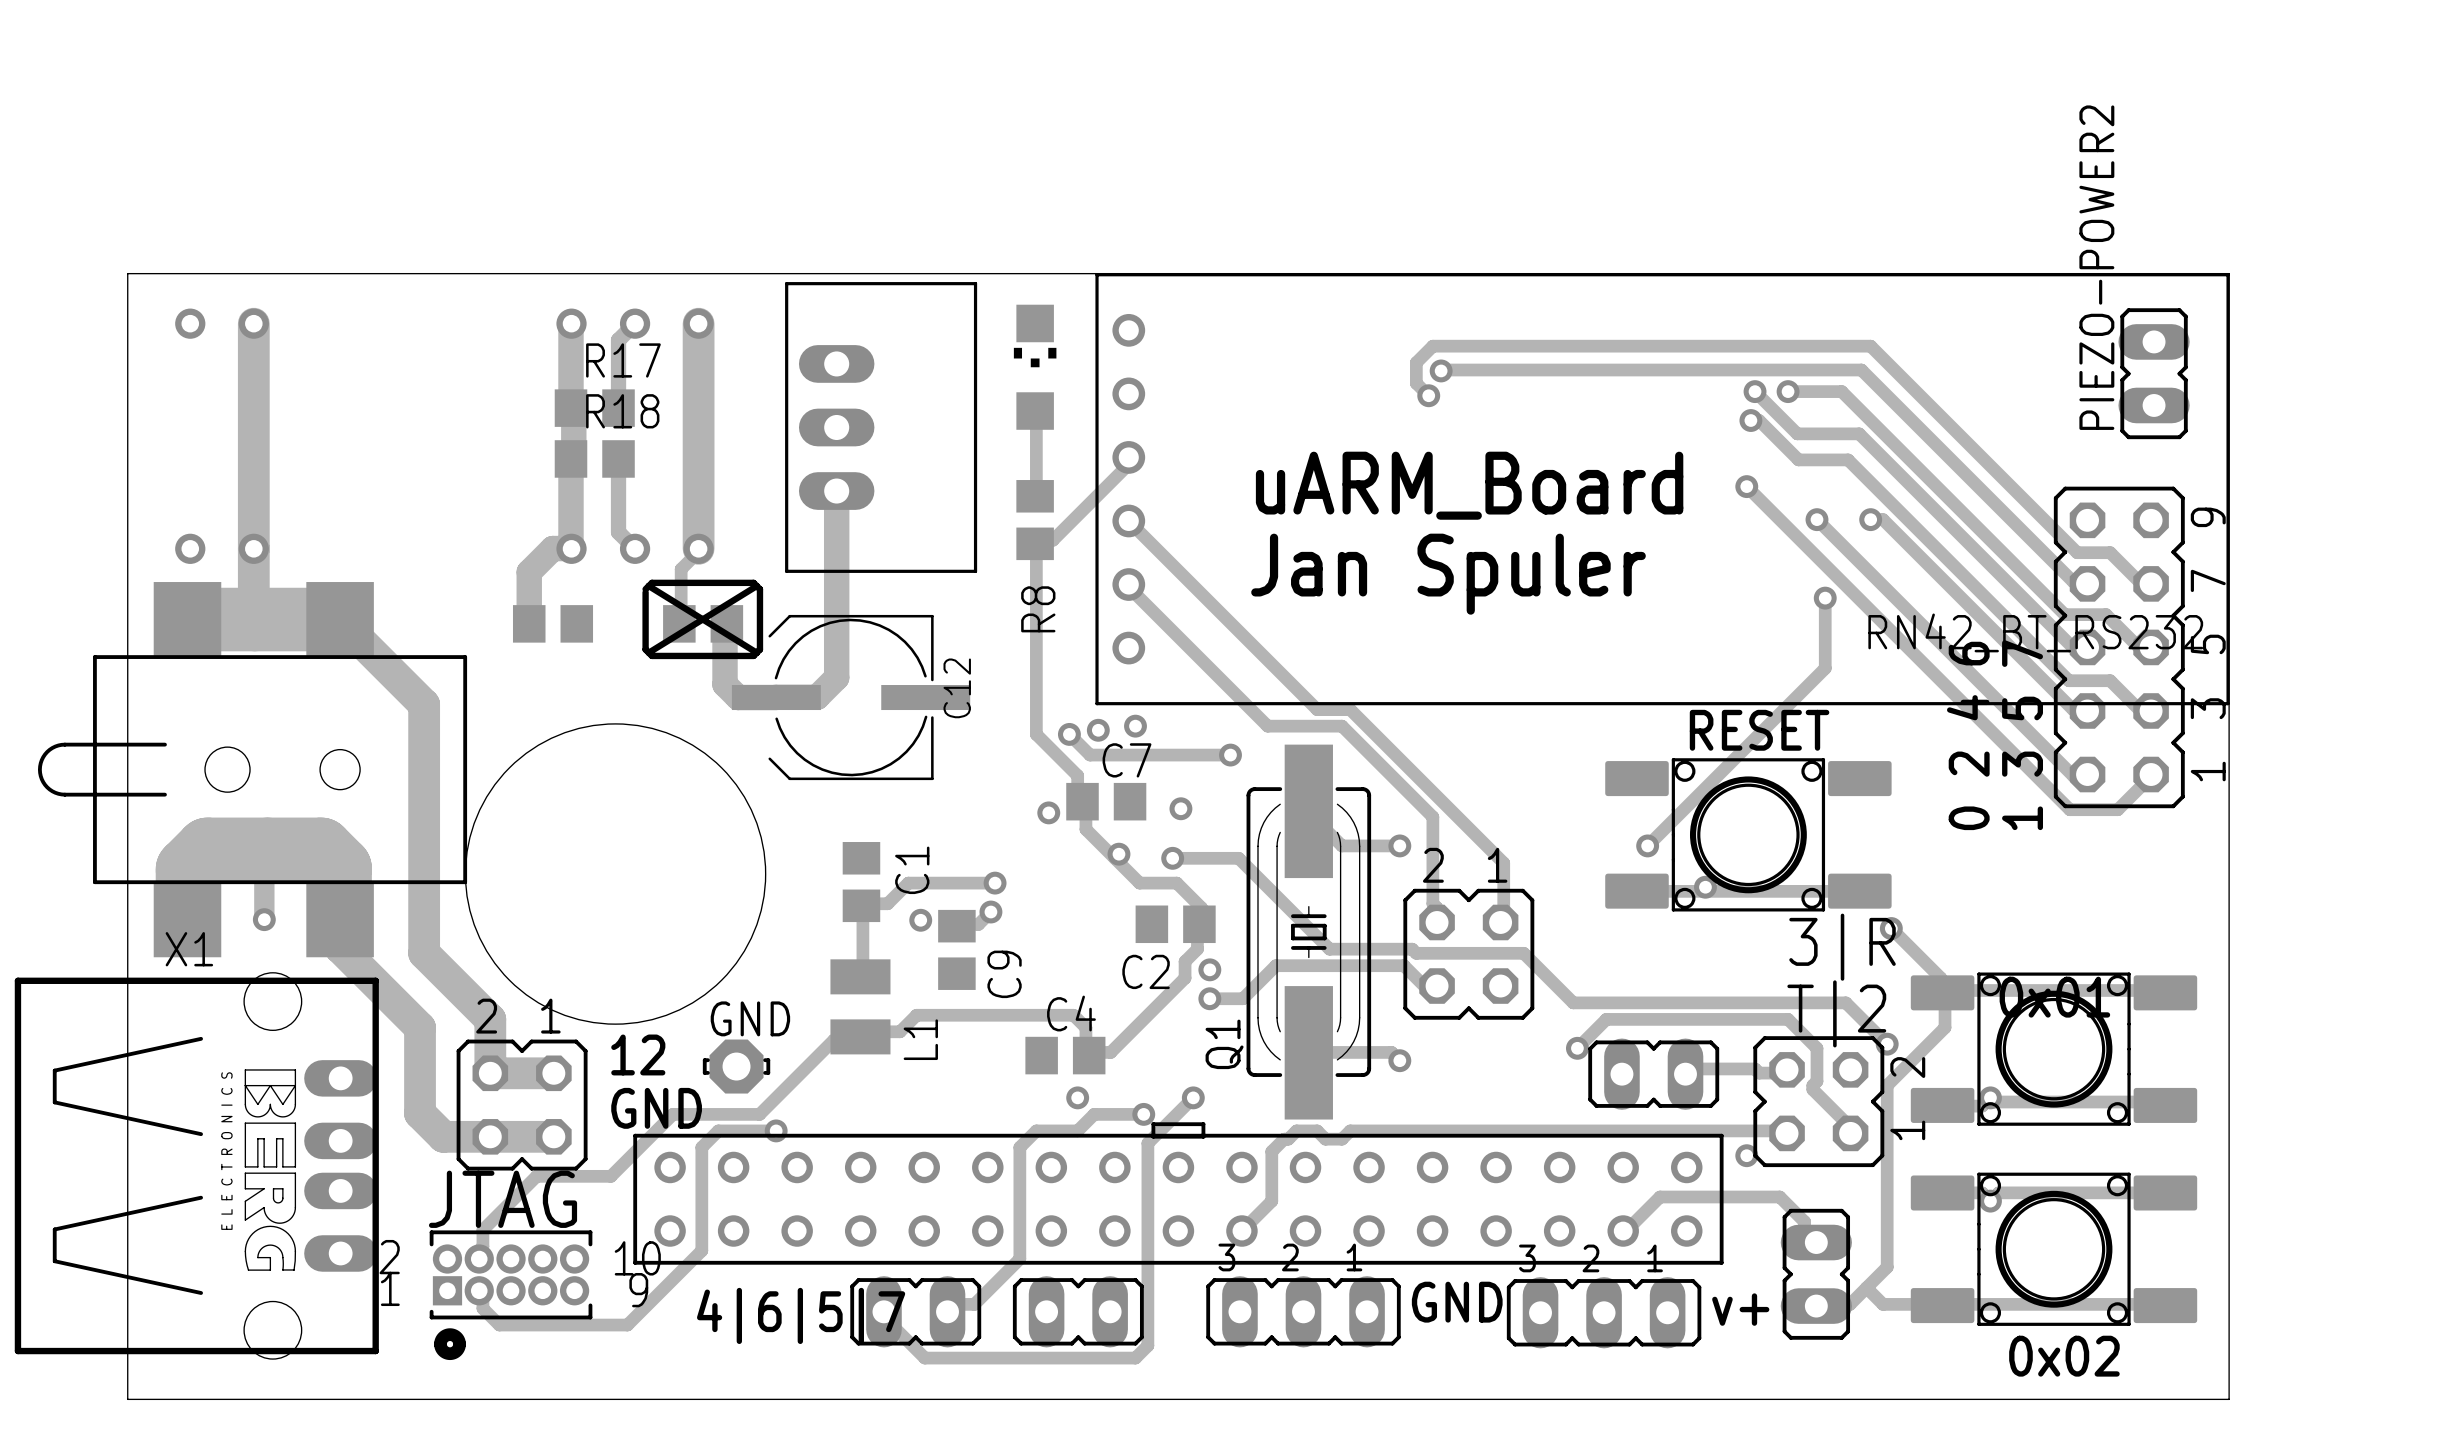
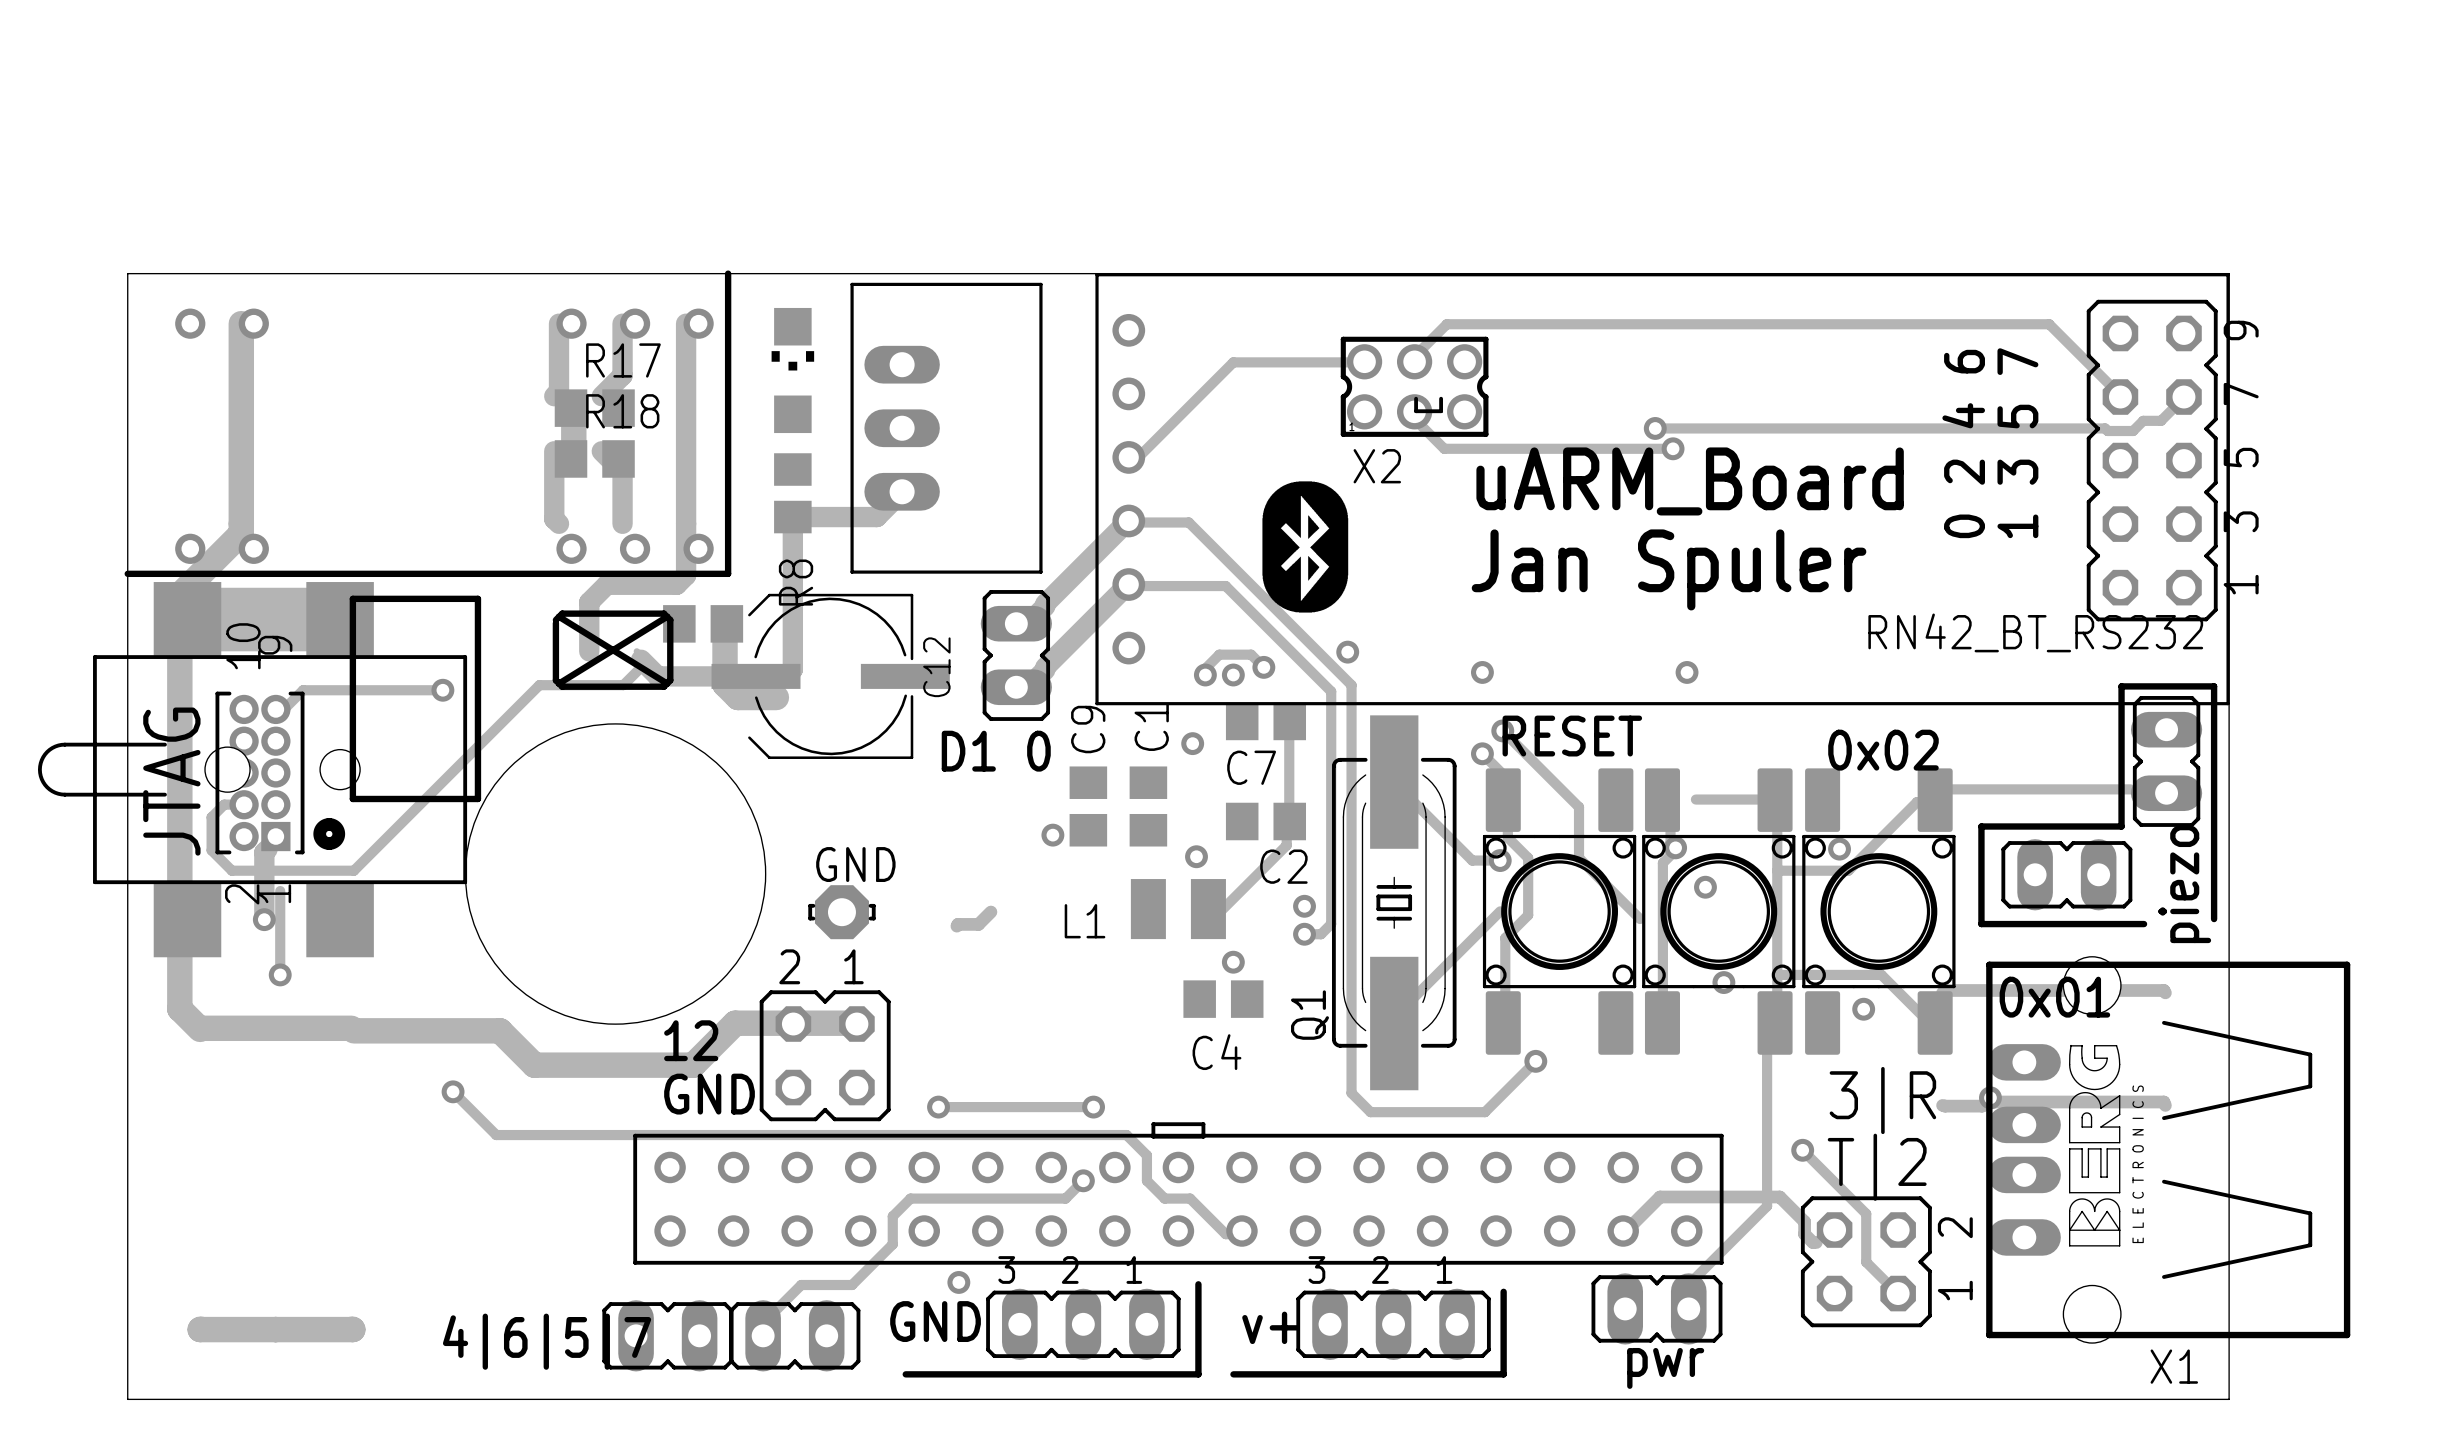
line: none -> (728, 273) (728, 573) (127, 573)
track: none -> (241, 323) (241, 533) (179, 594) (179, 1009) (200, 1029) (351, 1028) (353, 1030) (500, 1030) (534, 1065) (693, 1065) (735, 1023) (856, 1024)
track: (253, 323) (254, 619) -> none
track: none -> (559, 323) (559, 391) (554, 396)
track: (571, 323) (570, 408) (573, 408) -> none
track: none -> (622, 323) (622, 375) (601, 396)
track: (635, 323) (618, 340) (618, 408) -> none
track: none -> (686, 323) (686, 575) (676, 584) (606, 584) (589, 602) (589, 651)
track: (698, 323) (698, 548) (681, 569) (681, 622) (679, 623) -> none
track: none -> (1364, 361) (1233, 362) (1139, 456) (1131, 456) (1131, 458)
track: none -> (1414, 361) (1416, 354) (1446, 324) (2049, 324) (2120, 397)
part position: (1035, 367) -> (792, 370)
track: (1441, 370) (1861, 370) (2073, 581) -> none
via: (1441, 370) -> none
PIEZO-POWER2: (2154, 373) -> none
X2: none -> (1414, 386)
track: (1755, 391) (1797, 433) (1859, 433) (2073, 647) (2087, 647) -> none
via: (1755, 391) -> none
track: (1788, 391) (1841, 391) (2064, 614) (2106, 614) (2138, 646) (2151, 647) -> none
via: (1788, 391) -> none
track: (1428, 395) (1416, 383) (1416, 362) (1432, 346) (1870, 346) (2077, 552) (2110, 552) (2139, 581) (2147, 581) (2151, 583) -> none
via: (1428, 395) -> none
track: none -> (2183, 397) (2161, 420) (2143, 420) (2133, 431) (2107, 431) (2105, 428) (1655, 428)
line: none -> (1416, 398) (1416, 411) (1441, 411) (1441, 398)
track: (1035, 411) (1035, 496) -> none
track: none -> (1414, 411) (1416, 420) (1444, 448) (1673, 448)
track: (1750, 420) (1759, 420) (1798, 459) (1848, 459) (2068, 680) (2110, 680) (2139, 709) (2151, 710) -> none
via: (1750, 420) -> none
part position: (881, 427) -> (946, 428)
via: none -> (1655, 428)
via: none -> (1673, 448)
track: none -> (554, 451) (554, 519) (559, 523)
track: none -> (601, 451) (622, 472) (622, 523)
track: (573, 457) (570, 458) (570, 547) (552, 548) (529, 572) (529, 623) (532, 622) -> none
track: (1128, 457) (1127, 465) (1052, 540) (1036, 540) (1035, 543) (1036, 734) (1077, 775) (1077, 800) (1085, 804) (1085, 829) (1139, 883) (1176, 883) (1201, 907) (1201, 920) (1197, 924) (1197, 949) (1185, 961) (1185, 978) (1110, 1052) (1090, 1052) (1089, 1055) (1085, 1048) (1085, 1027) (1073, 1015) (916, 1015) (900, 1031) (862, 1031) (858, 1040) (833, 1040) (759, 1114) (672, 1114) (610, 1176) (536, 1176) (482, 1230) (482, 1246) (478, 1250) (478, 1258) -> none
track: (618, 458) (618, 532) (635, 548) -> none
drawing: none -> [1262, 481, 1349, 613]
text position: uARM_Board (1469, 485) -> uARM_Board (1690, 481)
track: (1746, 486) (2069, 809) (2117, 809) (2151, 774) -> none
via: (1746, 486) -> none
track: (836, 491) (836, 677) (817, 697) (776, 697) -> none
track: none -> (902, 491) (876, 517) (792, 517) (792, 669) (785, 676) (657, 676) (641, 659)
track: (1816, 519) (2073, 775) (2087, 774) -> none
via: (1816, 519) -> none
track: (1870, 519) (1883, 519) (2073, 709) (2087, 710) -> none
via: (1870, 519) -> none
R8 position: (1035, 520) -> (792, 493)
track: (1128, 520) (1317, 709) (1350, 709) (1503, 863) (1503, 919) (1500, 922) -> none
text position: Jan Spuler (1448, 574) -> Jan Spuler (1669, 569)
track: (1128, 584) (1131, 585) (1131, 589) (1267, 726) (1342, 726) (1432, 817) (1432, 903) (1437, 907) (1437, 922) -> none
line: (648, 586) (756, 652) -> (559, 616) (667, 683)
line: (756, 586) (648, 652) -> (667, 616) (559, 683)
line: (645, 589) (651, 582) (753, 582) (759, 589) (759, 649) (753, 655) (651, 655) (645, 649) (645, 592) -> (555, 619) (562, 613) (663, 613) (670, 619) (670, 680) (663, 686) (562, 686) (555, 680) (555, 623)
line: none -> (352, 598) (352, 798) (477, 798) (477, 598) (352, 598)
track: (1825, 598) (1825, 668) (1647, 845) -> none
via: (1825, 598) -> none
track: (340, 619) (338, 618) (424, 704) (424, 953) (490, 1019) (490, 1073) (553, 1073) -> none
part: (553, 623) -> none
track: none -> (1016, 623) (1017, 621) (1030, 621) (1045, 606) (1045, 603) (1129, 519) (1131, 522) (1188, 522) (1351, 685) (1351, 1093) (1370, 1112) (1484, 1112) (1535, 1061)
part position: (2119, 647) -> (2152, 460)
track: none -> (636, 651) (641, 654) (641, 667) (623, 685) (539, 685) (353, 870) (231, 870) (211, 850) (211, 817) (224, 804) (244, 804)
via: none -> (1347, 652)
part: none -> (1016, 655)
track: none -> (1263, 667) (1251, 654) (1219, 654) (1205, 668) (1205, 675)
via: none -> (1263, 667)
via: none -> (1482, 672)
via: none -> (1687, 672)
via: none -> (1205, 675)
via: none -> (1233, 675)
track: none -> (1016, 687) (1017, 685) (1030, 685) (1045, 669) (1045, 667) (1129, 583) (1131, 586) (1225, 586) (1331, 691) (1331, 924) (1321, 934) (1304, 934)
track: none -> (442, 690) (303, 690) (285, 708) (275, 709)
via: none -> (442, 690)
C12 position: (851, 697) -> (830, 676)
track: none -> (1289, 721) (1289, 821) (1286, 822) (1286, 845) (1215, 916)
via: (1135, 726) -> none
via: (1098, 730) -> none
track: none -> (1502, 730) (1579, 807) (1579, 858) (1640, 919)
via: none -> (1502, 730)
text position: RESET (1759, 730) -> RESET (1572, 736)
track: (1069, 734) (1090, 755) (1230, 755) -> none
via: (1069, 734) -> none
text position: 0 2 4 6 (1968, 735) -> 0 2 4 6 (1963, 443)
text position: 1 3 5 7 (2022, 735) -> 1 3 5 7 (2017, 443)
via: none -> (1192, 743)
text: none -> 0x02 (1883, 750)
text: none -> D1 0 (996, 751)
track: none -> (1482, 753) (1502, 774) (1502, 799) (1507, 804) (1507, 837) (1528, 858) (1528, 915) (1505, 938) (1505, 1020) (1503, 1022)
via: none -> (1482, 753)
via: (1230, 755) -> none
C7 name position: C7 (1127, 760) -> C7 (1251, 767)
part: none -> (2166, 761)
track: none -> (1394, 782) (1472, 860) (1500, 860)
track: none -> (2166, 793) (2133, 791) (2130, 789) (1947, 789) (1934, 802) (1917, 802) (1848, 870) (1777, 870)
track: none -> (1695, 799) (1772, 799) (1777, 802) (1777, 1020) (1767, 1033) (1767, 1206) (1690, 1282) (1690, 1307) (1688, 1308)
track: none -> (1662, 800) (1670, 809) (1670, 842) (1675, 847) (1675, 850) (1662, 863) (1662, 1022)
C7 position: (1106, 801) -> (1265, 721)
via: (1180, 808) -> none
track: (1308, 811) (1342, 845) (1399, 845) -> none
via position: (1048, 812) -> (1052, 835)
part: (1748, 834) -> none
via: (1399, 845) -> none
via position: (1647, 845) -> (1675, 847)
via: none -> (1839, 849)
via: (1118, 854) -> none
track: (1172, 858) (1238, 858) (1329, 949) (1412, 949) (1416, 953) (1523, 953) (1573, 1002) (1845, 1002) (1887, 1044) -> none
via position: (1172, 858) -> (1196, 856)
via: none -> (1500, 860)
C1 name position: C1 (912, 870) -> C1 (1151, 727)
part: none -> (2066, 874)
C1 position: (861, 882) -> (1148, 806)
track: (995, 883) (908, 883) (887, 903) (867, 903) (861, 905) (862, 973) (860, 976) -> none
via: (995, 883) -> none
text: none -> piezo (2184, 884)
track: none -> (280, 891) (280, 974)
track: (1636, 891) (1859, 891) -> none
via: none -> (1304, 906)
track: none -> (1500, 911) (1396, 1015) (1396, 1023) (1394, 1023)
part: none -> (1559, 911)
part: none -> (1718, 911)
part: none -> (1878, 911)
via: (990, 912) -> none
track: (340, 919) (340, 947) (420, 1027) (420, 1113) (443, 1136) (553, 1136) -> none
track: (340, 919) (340, 868) (321, 849) (207, 849) (187, 869) (187, 919) (189, 920) -> none
line: none -> (2214, 919) (2214, 686) (2121, 686) (2121, 826) (1981, 826) (1981, 924) (2144, 924)
via: (920, 920) -> none
C2 position: (1175, 924) -> (1265, 821)
track: (1891, 928) (1940, 978) (1940, 986) (1945, 998) (1945, 1027) (1887, 1085) (1887, 1267) (1850, 1304) (1816, 1304) (1816, 1306) -> none
via: (1891, 928) -> none
Q1 position: (1308, 932) -> (1394, 902)
via: none -> (1304, 934)
text position: 3|R (1842, 947) -> 3|R (1882, 1100)
X1 name position: X1 (189, 949) -> X1 (2174, 1366)
C9 position: (956, 949) -> (1088, 806)
part: (1468, 954) -> none
via: none -> (1233, 962)
via: (1209, 969) -> none
C2 name position: C2 (1146, 971) -> C2 (1283, 866)
X1 footprint: [14, 972, 379, 1360] -> [1986, 956, 2351, 1344]
via: none -> (280, 974)
C9 name position: C9 (1004, 974) -> C9 (1088, 729)
track: none -> (1777, 974) (1881, 974) (1927, 1020) (1934, 1020) (1935, 1022)
via: none -> (1723, 982)
track: (1437, 986) (1424, 986) (1403, 965) (1275, 965) (1242, 998) (1209, 998) -> none
via: (1209, 998) -> none
L1 rotation: 0° (860, 1006) -> 90° clockwise (1178, 909)
L1 position: (860, 1006) -> (1178, 909)
C4 name position: C4 (1071, 1013) -> C4 (1216, 1052)
text position: T|2 (1836, 1013) -> T|2 (1877, 1167)
L1 name position: L1 (920, 1039) -> L1 (1085, 921)
via position: (1887, 1044) -> (1863, 1009)
track: (1577, 1048) (1606, 1019) (1788, 1019) (1816, 1048) (1816, 1081) (1812, 1085) (1812, 1089) (1854, 1130) (1850, 1133) -> none
via position: (1577, 1048) -> (1535, 1061)
part: (2053, 1049) -> none
track: (1308, 1052) (1391, 1052) (1399, 1060) -> none
text position: 12 (638, 1054) -> 12 (691, 1040)
C4 position: (1065, 1055) -> (1223, 999)
via: (1399, 1060) -> none
GND position: (736, 1066) -> (841, 912)
track: (1787, 1069) (1783, 1073) (1759, 1073) (1755, 1068) (1693, 1068) (1685, 1074) -> none
part: (1653, 1074) -> none
via: none -> (453, 1091)
via position: (1077, 1097) -> (1093, 1107)
track: (1193, 1097) (1147, 1143) (1147, 1345) (1135, 1358) (924, 1358) (887, 1320) (887, 1312) (883, 1311) -> none
via: (1193, 1097) -> none
part position: (1818, 1101) -> (1866, 1261)
part position: (522, 1105) -> (825, 1055)
track: none -> (938, 1107) (1093, 1107)
via: none -> (938, 1107)
text position: GND (656, 1108) -> GND (709, 1094)
track: (1143, 1114) (1094, 1114) (1077, 1130) (1036, 1130) (1019, 1147) (1019, 1258) (974, 1304) (953, 1304) (947, 1311) -> none
via: (1143, 1114) -> none
track: (776, 1130) (718, 1130) (701, 1147) (701, 1250) (627, 1325) (499, 1325) (482, 1308) (482, 1291) (479, 1290) -> none
via: (776, 1130) -> none
track: (1787, 1133) (1783, 1130) (1350, 1130) (1342, 1139) (1325, 1139) (1317, 1130) (1296, 1130) (1288, 1139) (1284, 1139) (1271, 1151) (1271, 1201) (1241, 1231) -> (453, 1091) (496, 1135) (1126, 1135) (1146, 1155) (1146, 1180) (1164, 1198) (1190, 1198) (1225, 1234) (1238, 1234) (1241, 1231)
track: none -> (1802, 1150) (1866, 1213) (1866, 1262) (1898, 1293)
via position: (1746, 1155) -> (1802, 1150)
track: none -> (1083, 1180) (1065, 1198) (910, 1198) (892, 1216) (892, 1244) (852, 1285) (801, 1285) (763, 1323) (763, 1335)
via: none -> (1083, 1180)
track: (1942, 1192) (1982, 1192) (1990, 1201) (1998, 1192) (2165, 1192) -> none
via: (1990, 1201) -> none
part: (2053, 1249) -> none
part: (1816, 1274) -> none
part footprint: [1012, 1276, 1144, 1348] -> [986, 1288, 1181, 1360]
via: none -> (958, 1282)
line: none -> (1198, 1284) (1198, 1374) (905, 1374)
track: (1866, 1287) (1883, 1304) (2165, 1305) -> none
line: none -> (1503, 1291) (1503, 1374) (1233, 1374)
JTAG rotation: 0° (511, 1295) -> 90° counterclockwise (280, 772)
JTAG position: (511, 1295) -> (280, 772)
text: GND (1457, 1302) -> none
part: none -> (1656, 1308)
text position: v+ (1740, 1309) -> v+ (1270, 1327)
part position: (915, 1311) -> (794, 1335)
part position: (1303, 1311) -> (1393, 1324)
part: (1604, 1312) -> none
text position: 4|6|5|7 (801, 1315) -> 4|6|5|7 (547, 1341)
text: none -> GND (935, 1321)
track: none -> (200, 1329) (352, 1329)
part: none -> (667, 1335)
text: 0x02 (2064, 1356) -> none
text: none -> pwr (1665, 1368)

